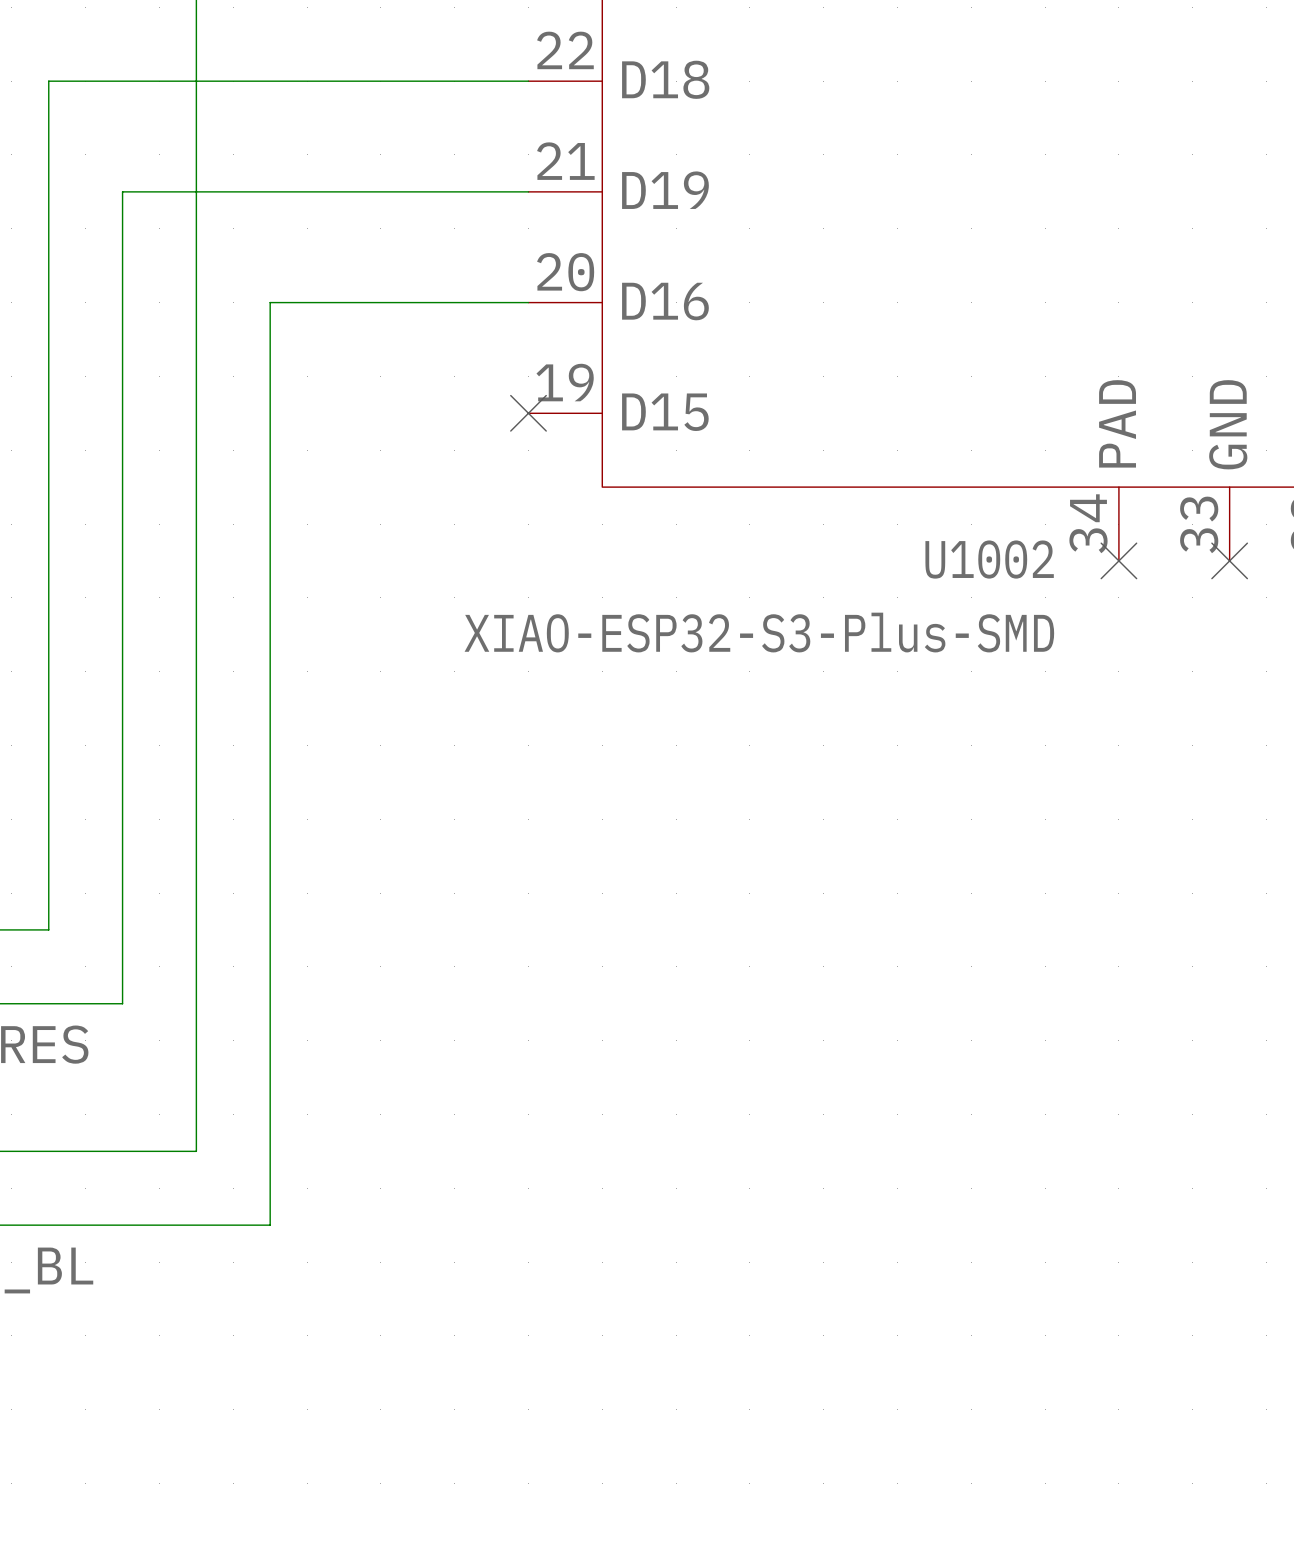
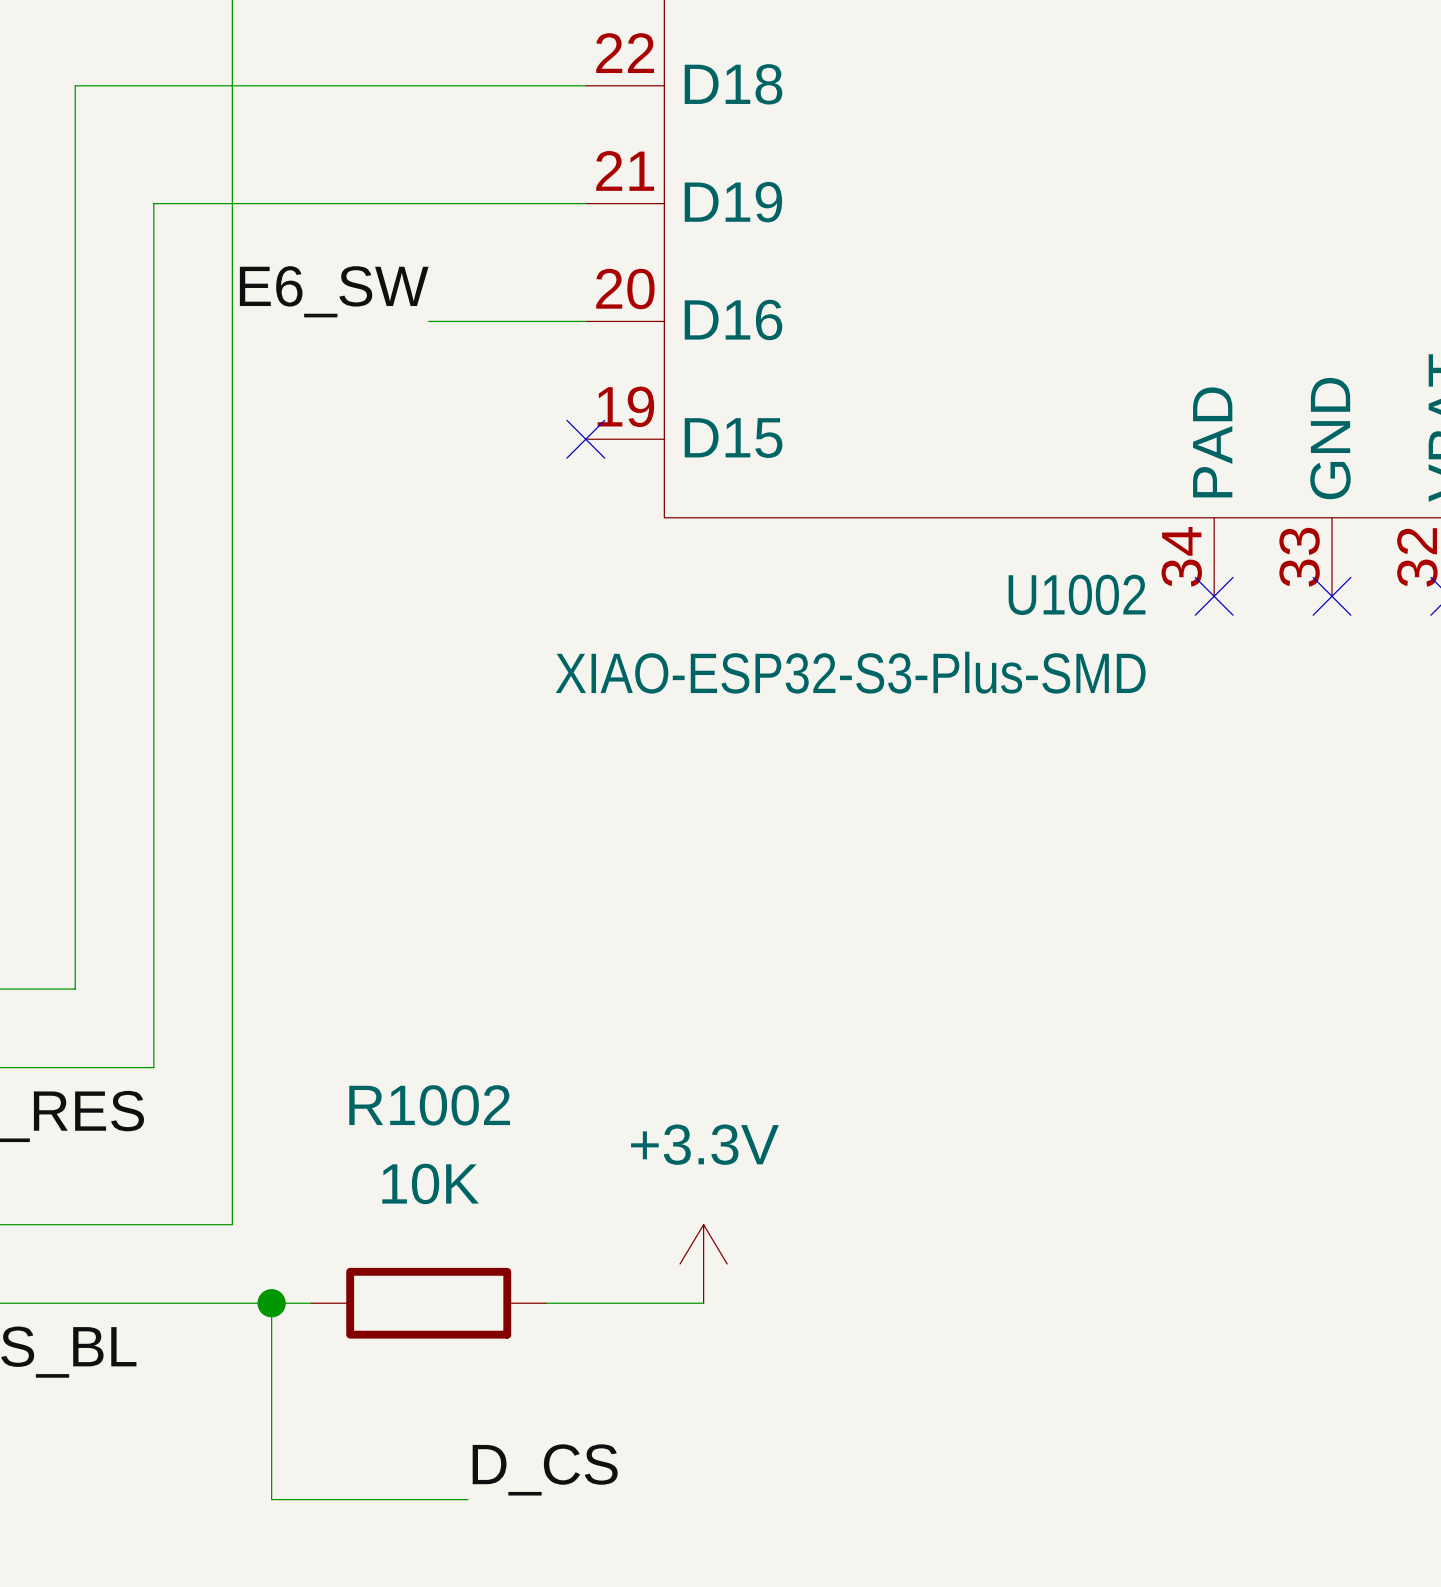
label: none -> E6_SW (334, 291)
wire: (380, 302) (270, 302) (270, 1225) -> none
power symbol: none -> +3.3V (703, 1263)
wire: none -> (271, 1303) (271, 1499) (467, 1499)
junction: none -> (271, 1303)
R1002: none -> 10K (428, 1303)
wire: none -> (546, 1303) (703, 1303)
label: none -> D_CS (545, 1469)

